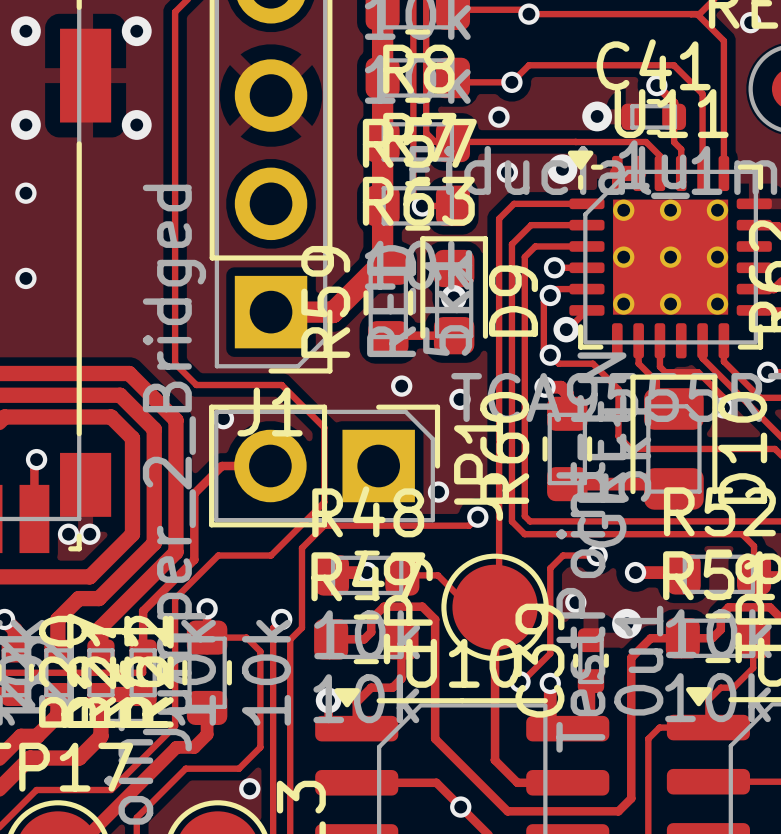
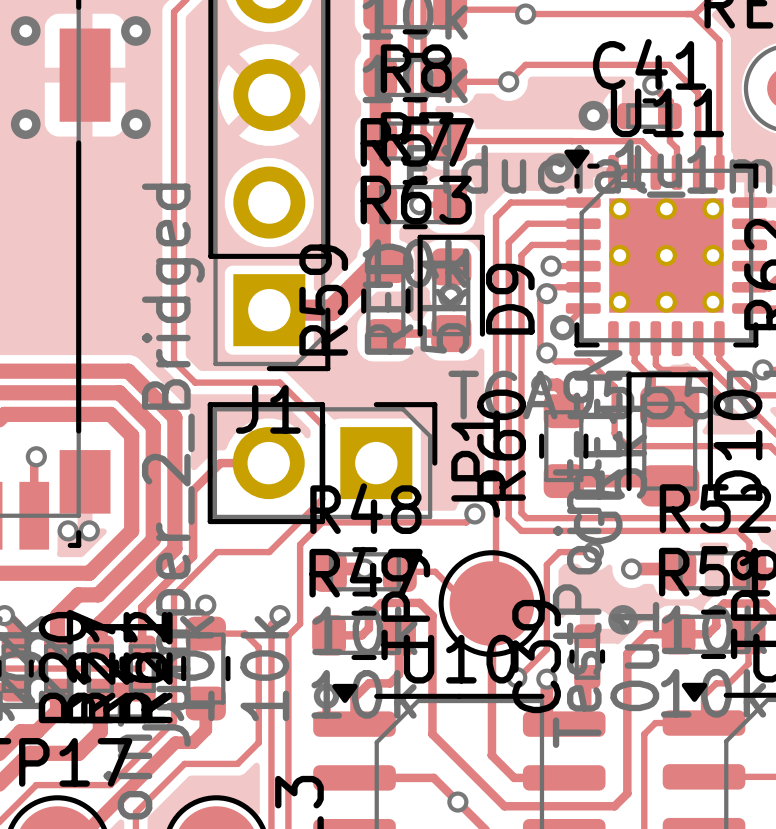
via: (750, 22) -> none
via: (498, 117) -> none
via: (507, 172) -> none
via: (25, 193) -> none
via: (25, 278) -> none
via: (401, 386) -> none
via: (459, 399) -> none
via: (223, 418) -> none
via: (438, 492) -> none
via: (575, 602) -> none
via: (249, 788) -> none

